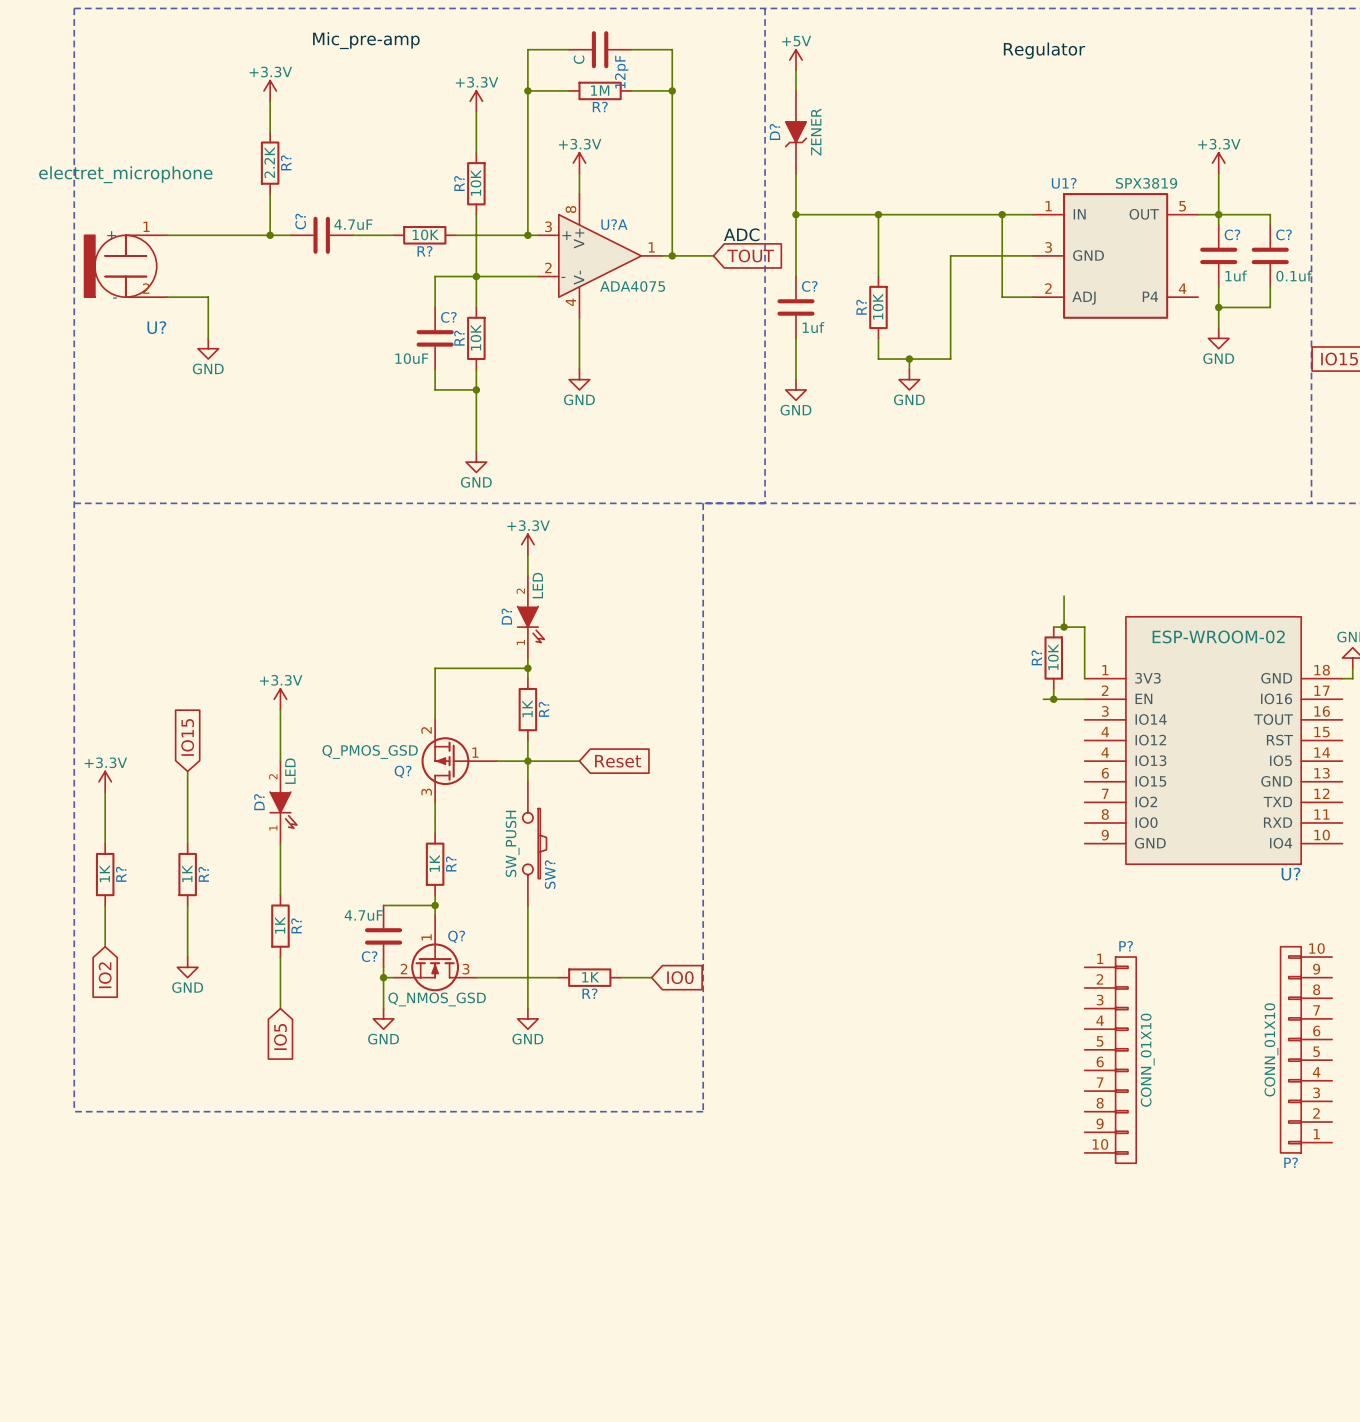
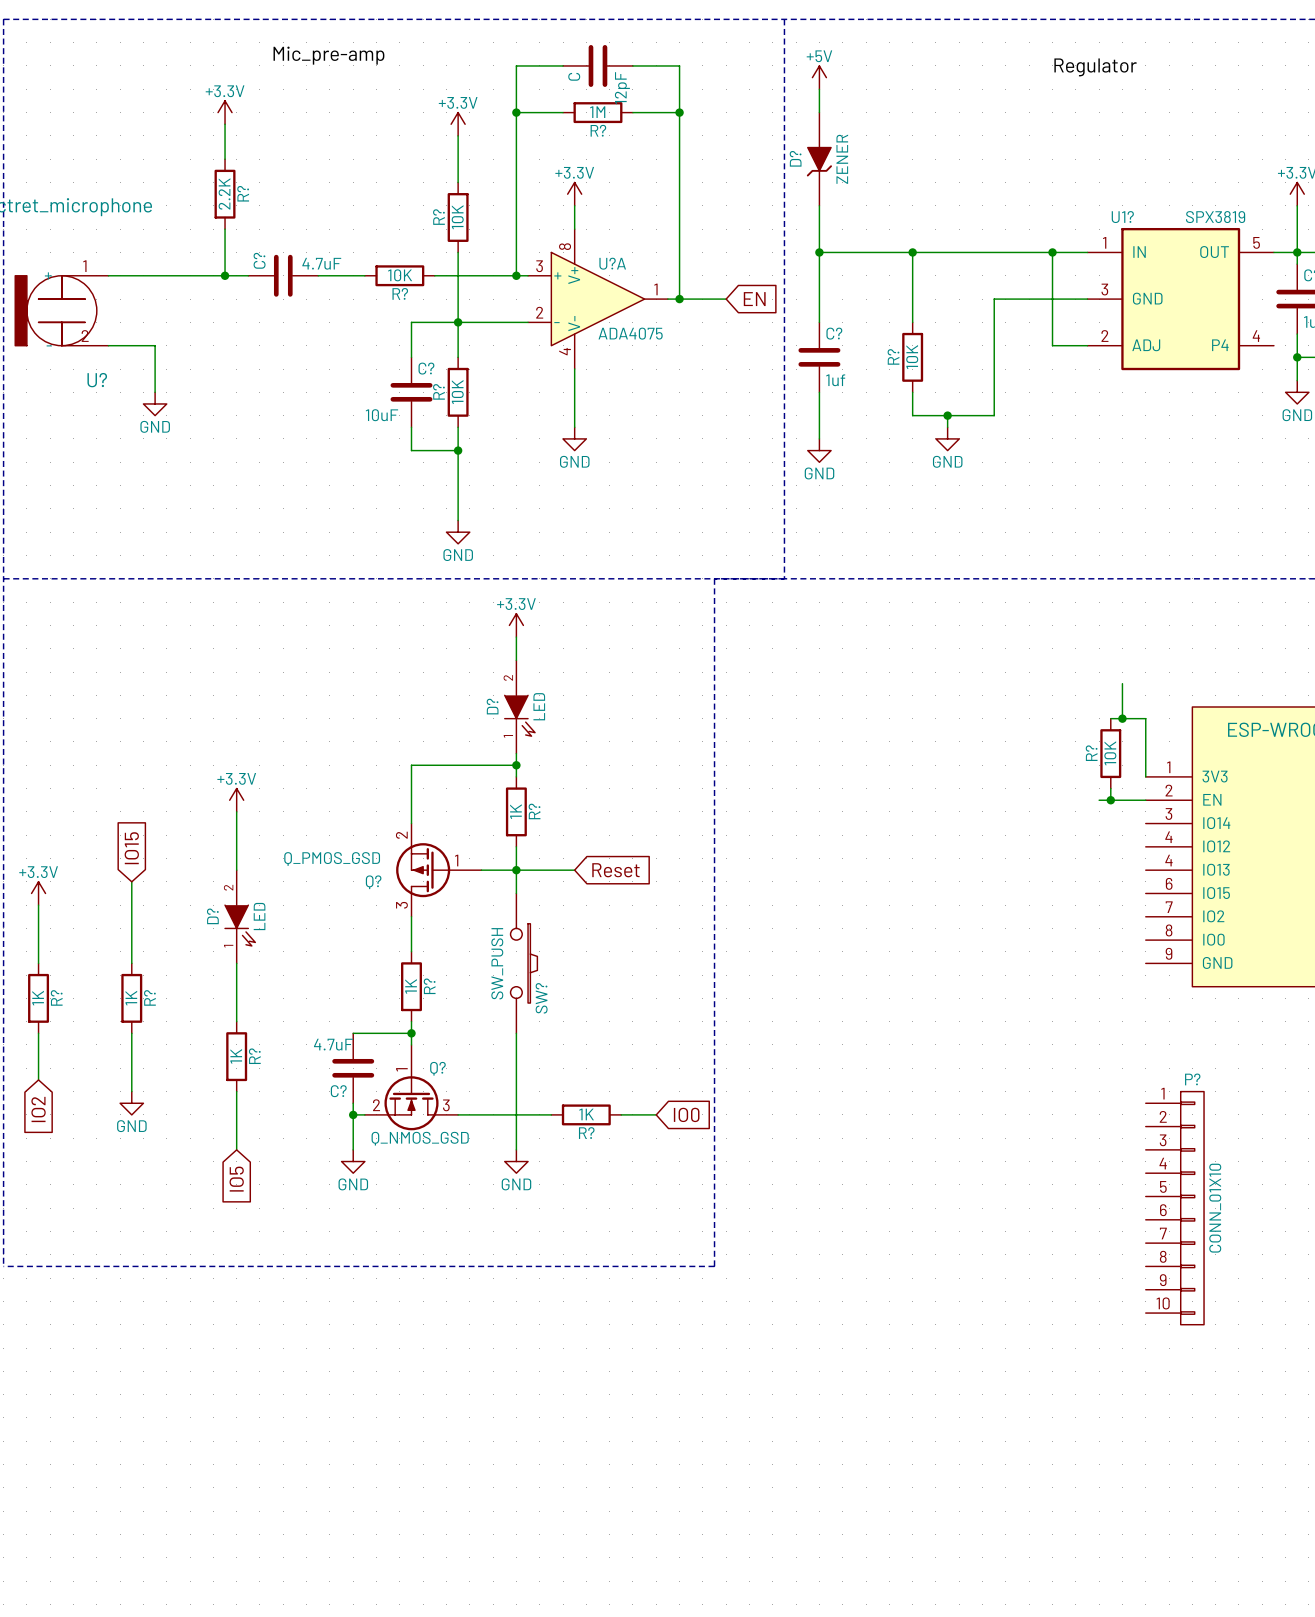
label: ADC (741, 234) -> none
global label: TOUT (750, 255) -> EN (754, 299)
D? value position: LED (537, 585) -> LED (539, 706)
D? value position: LED (290, 771) -> LED (259, 916)

